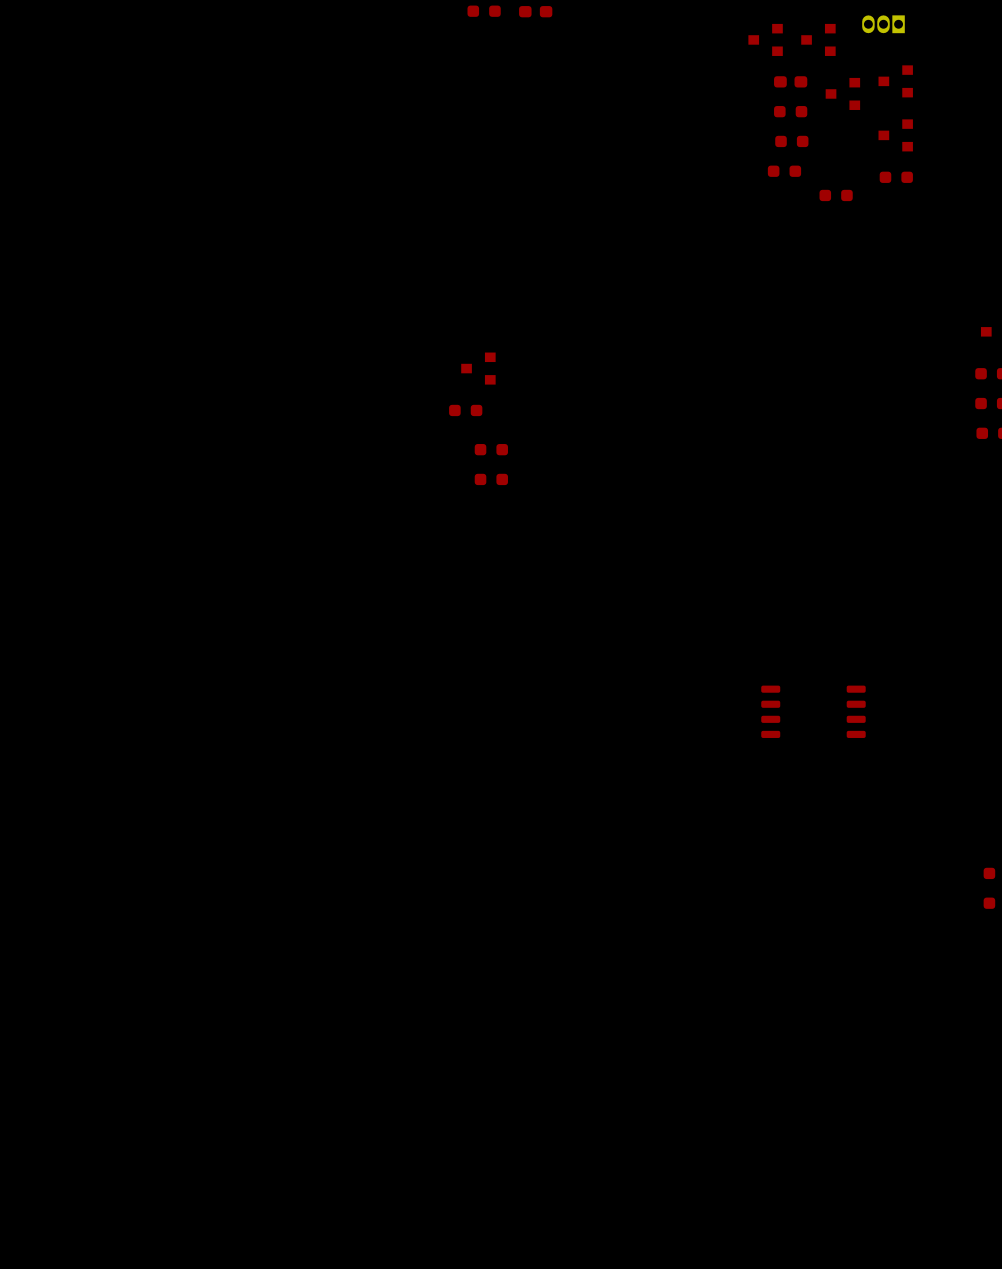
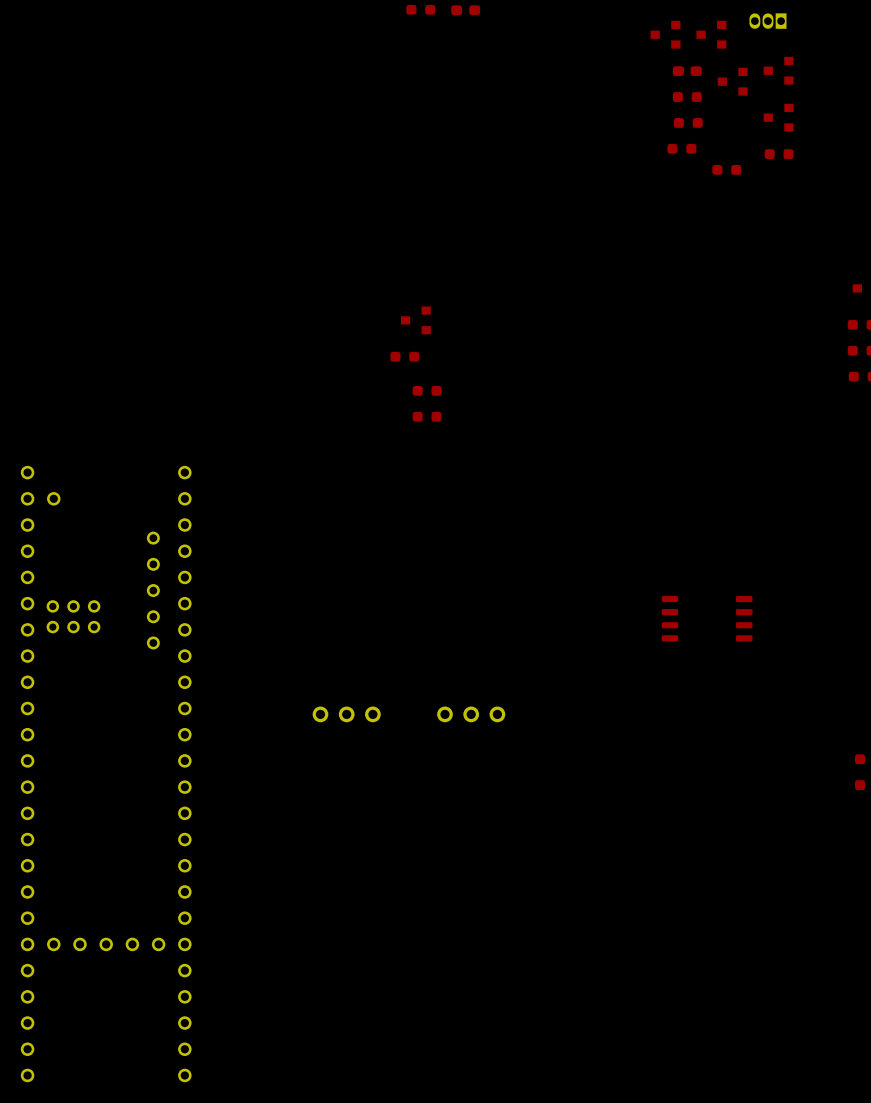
part: none -> (346, 714)
part: none -> (471, 714)
part: none -> (106, 774)

